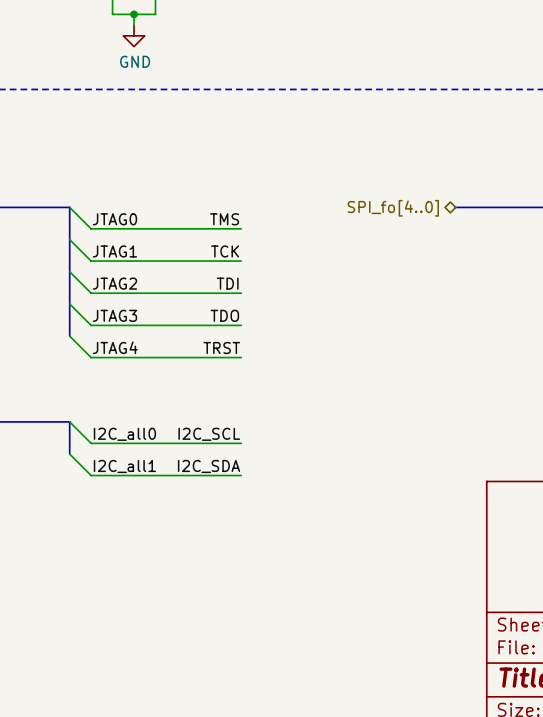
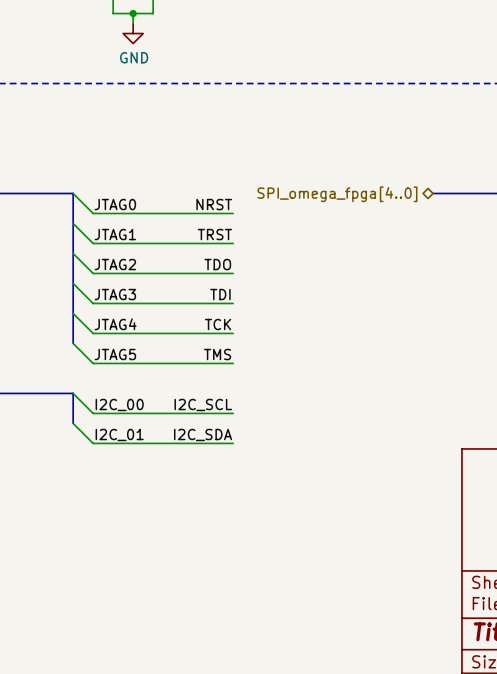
hierarchical label: SPI_fo[4..0] (393, 208) -> SPI_omega_fpga[4..0] (337, 194)
label: TMS (224, 219) -> NRST (214, 204)
label: TCK (225, 251) -> TRST (214, 234)
label: TDI (227, 283) -> TDO (217, 264)
label: TDO (224, 315) -> TDI (220, 294)
bus: none -> (73, 313) (73, 343)
label: TRST (221, 347) -> TCK (218, 324)
wire: none -> (73, 343) (93, 363) (233, 363)
label: none -> JTAG5 (115, 354)
label: none -> TMS (217, 354)
label: I2C_all0 (124, 434) -> I2C_00 (119, 404)
label: I2C_all1 (124, 466) -> I2C_01 (119, 434)

